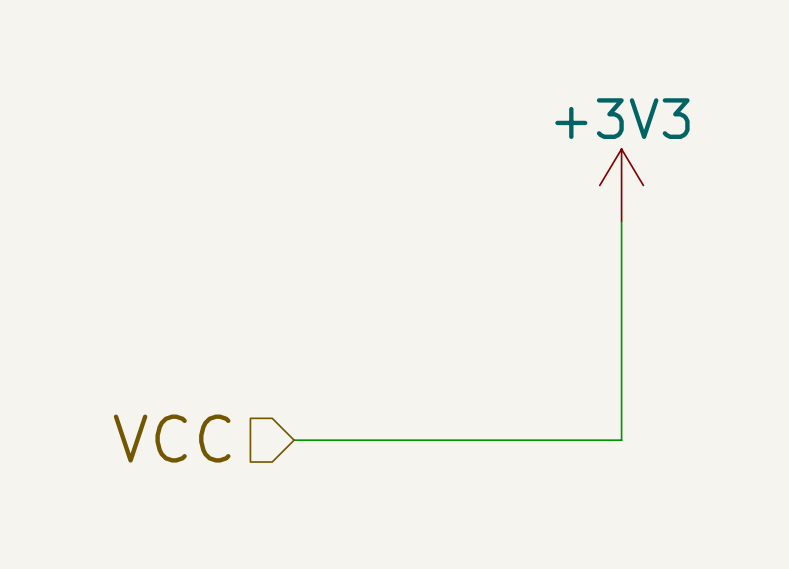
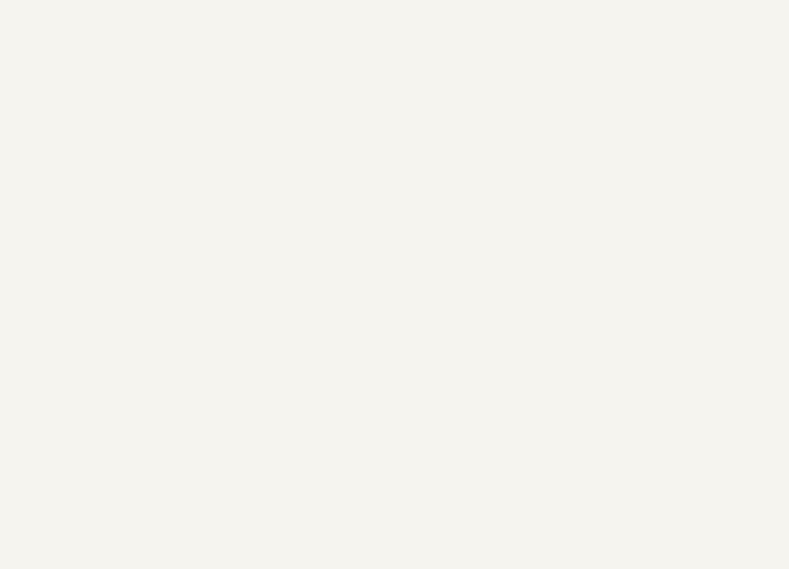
power symbol: +3V3 (621, 185) -> none
wire: (621, 221) (621, 440) (294, 440) -> none
hierarchical label: VCC (172, 438) -> none

